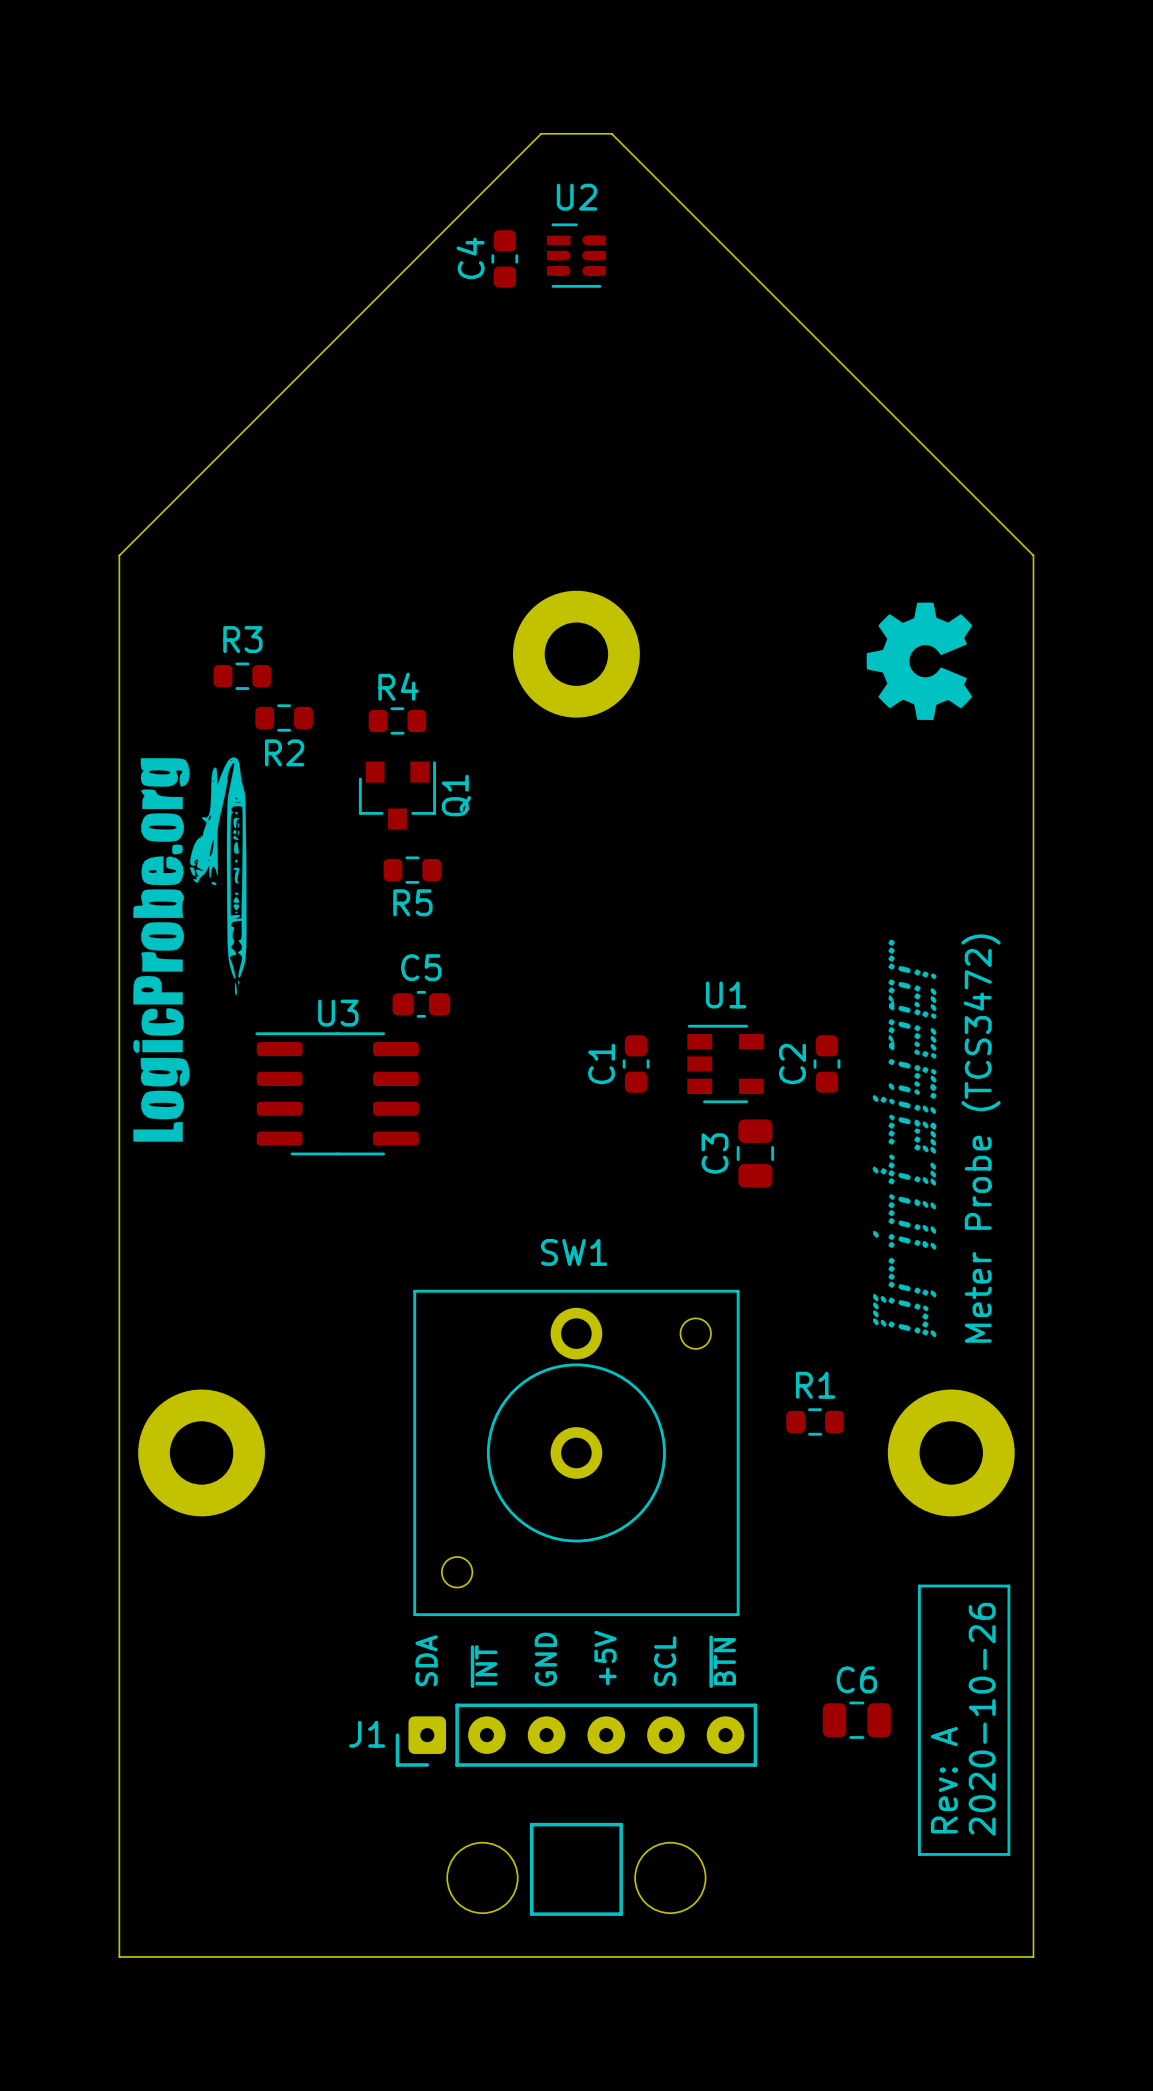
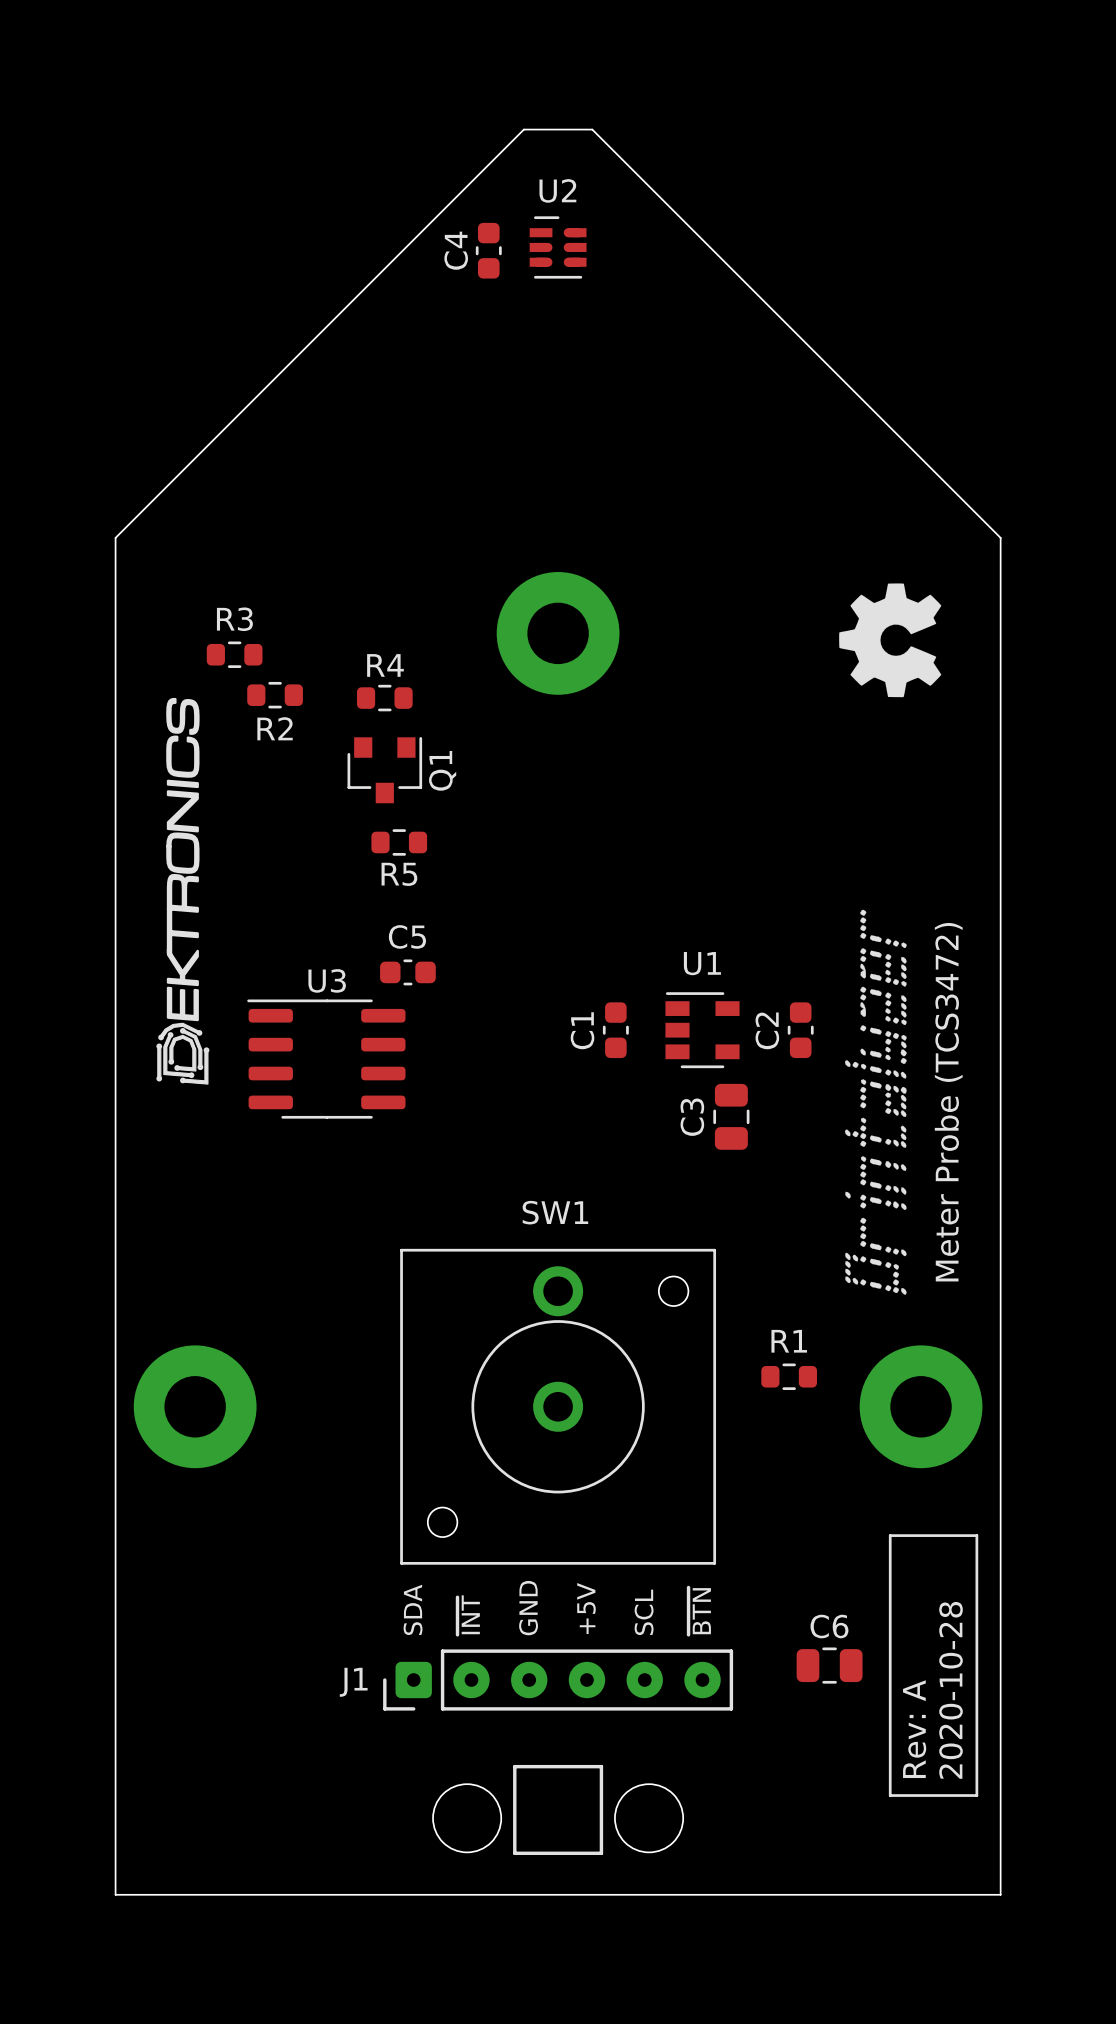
drawing: none -> [156, 697, 210, 1085]
drawing: [133, 757, 247, 1142] -> none
text: 2020-10-26 (982, 1719) -> 2020-10-28 (951, 1690)

